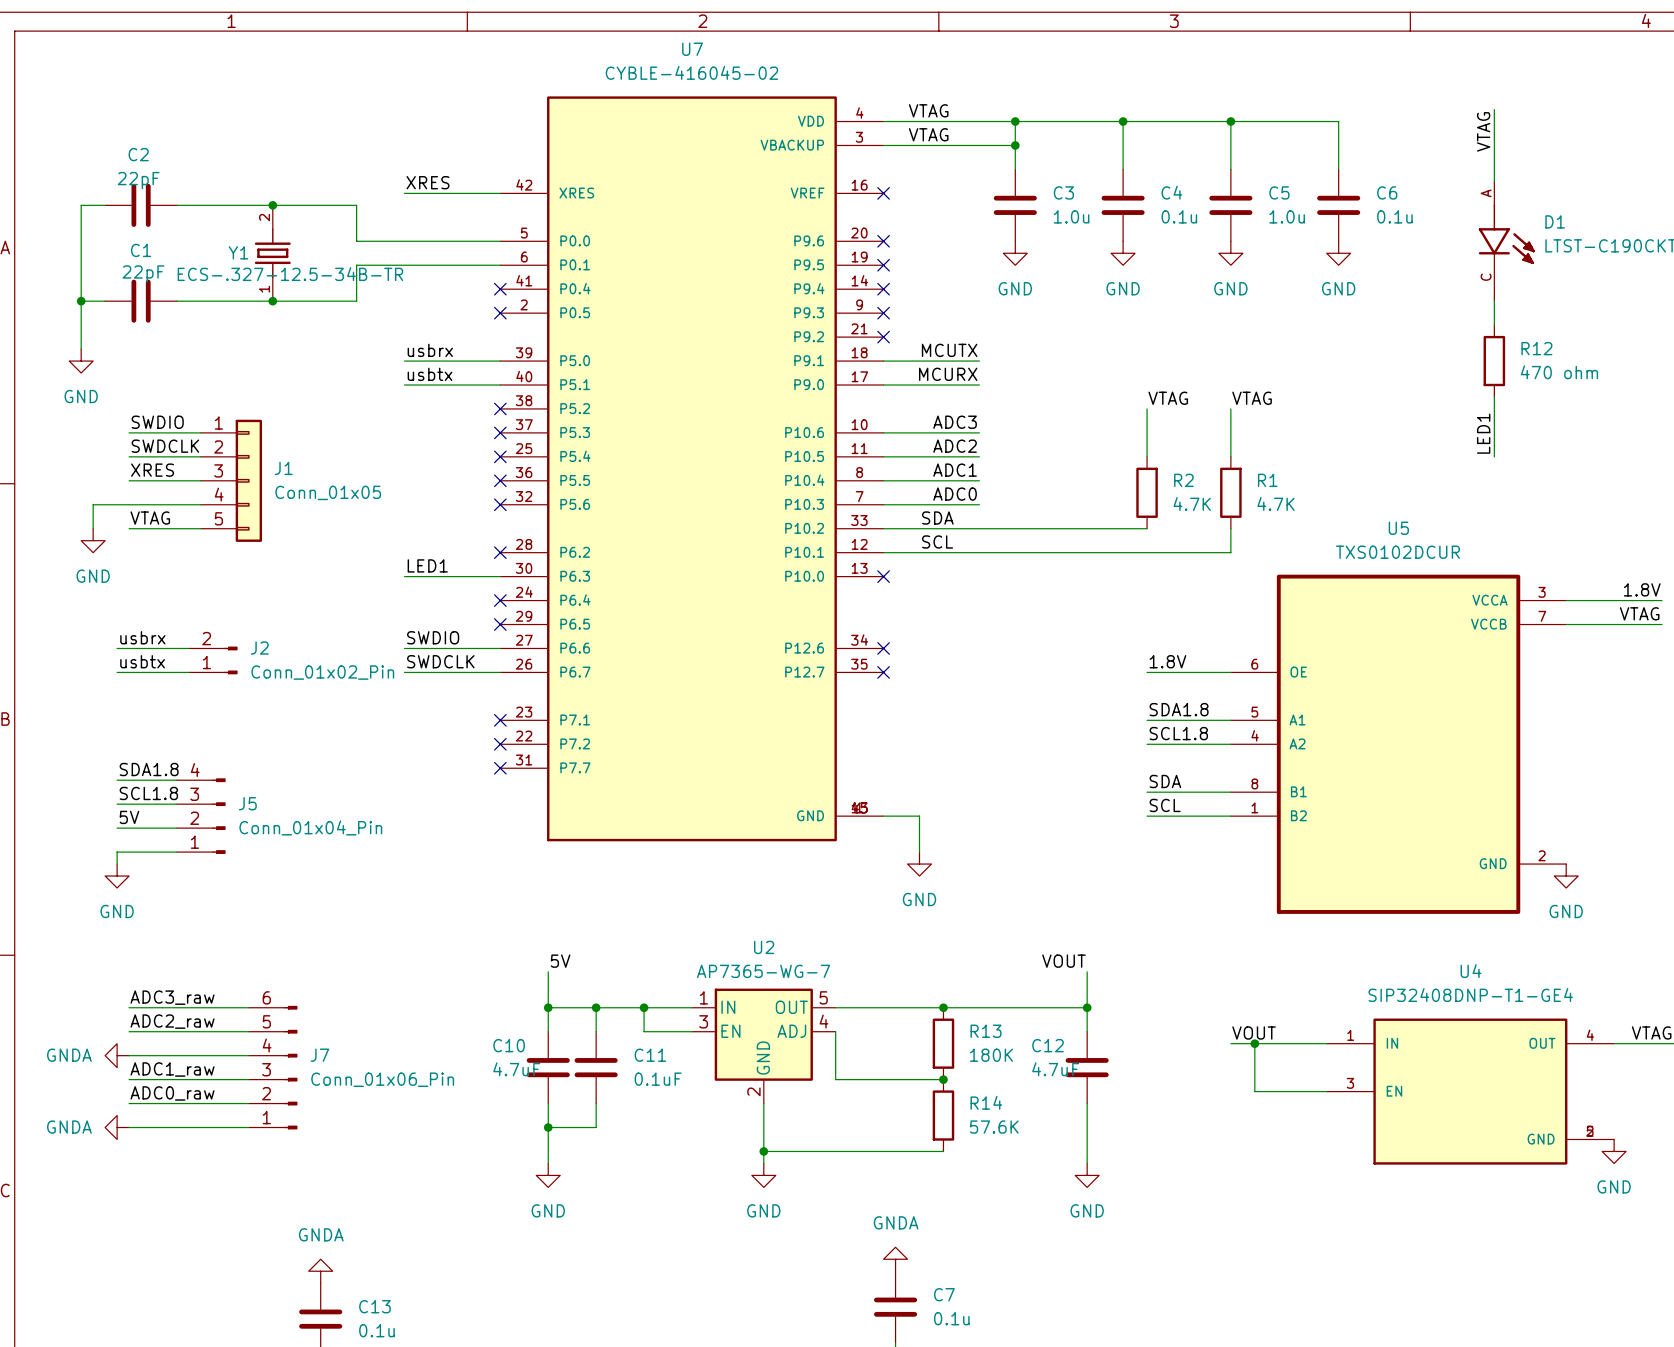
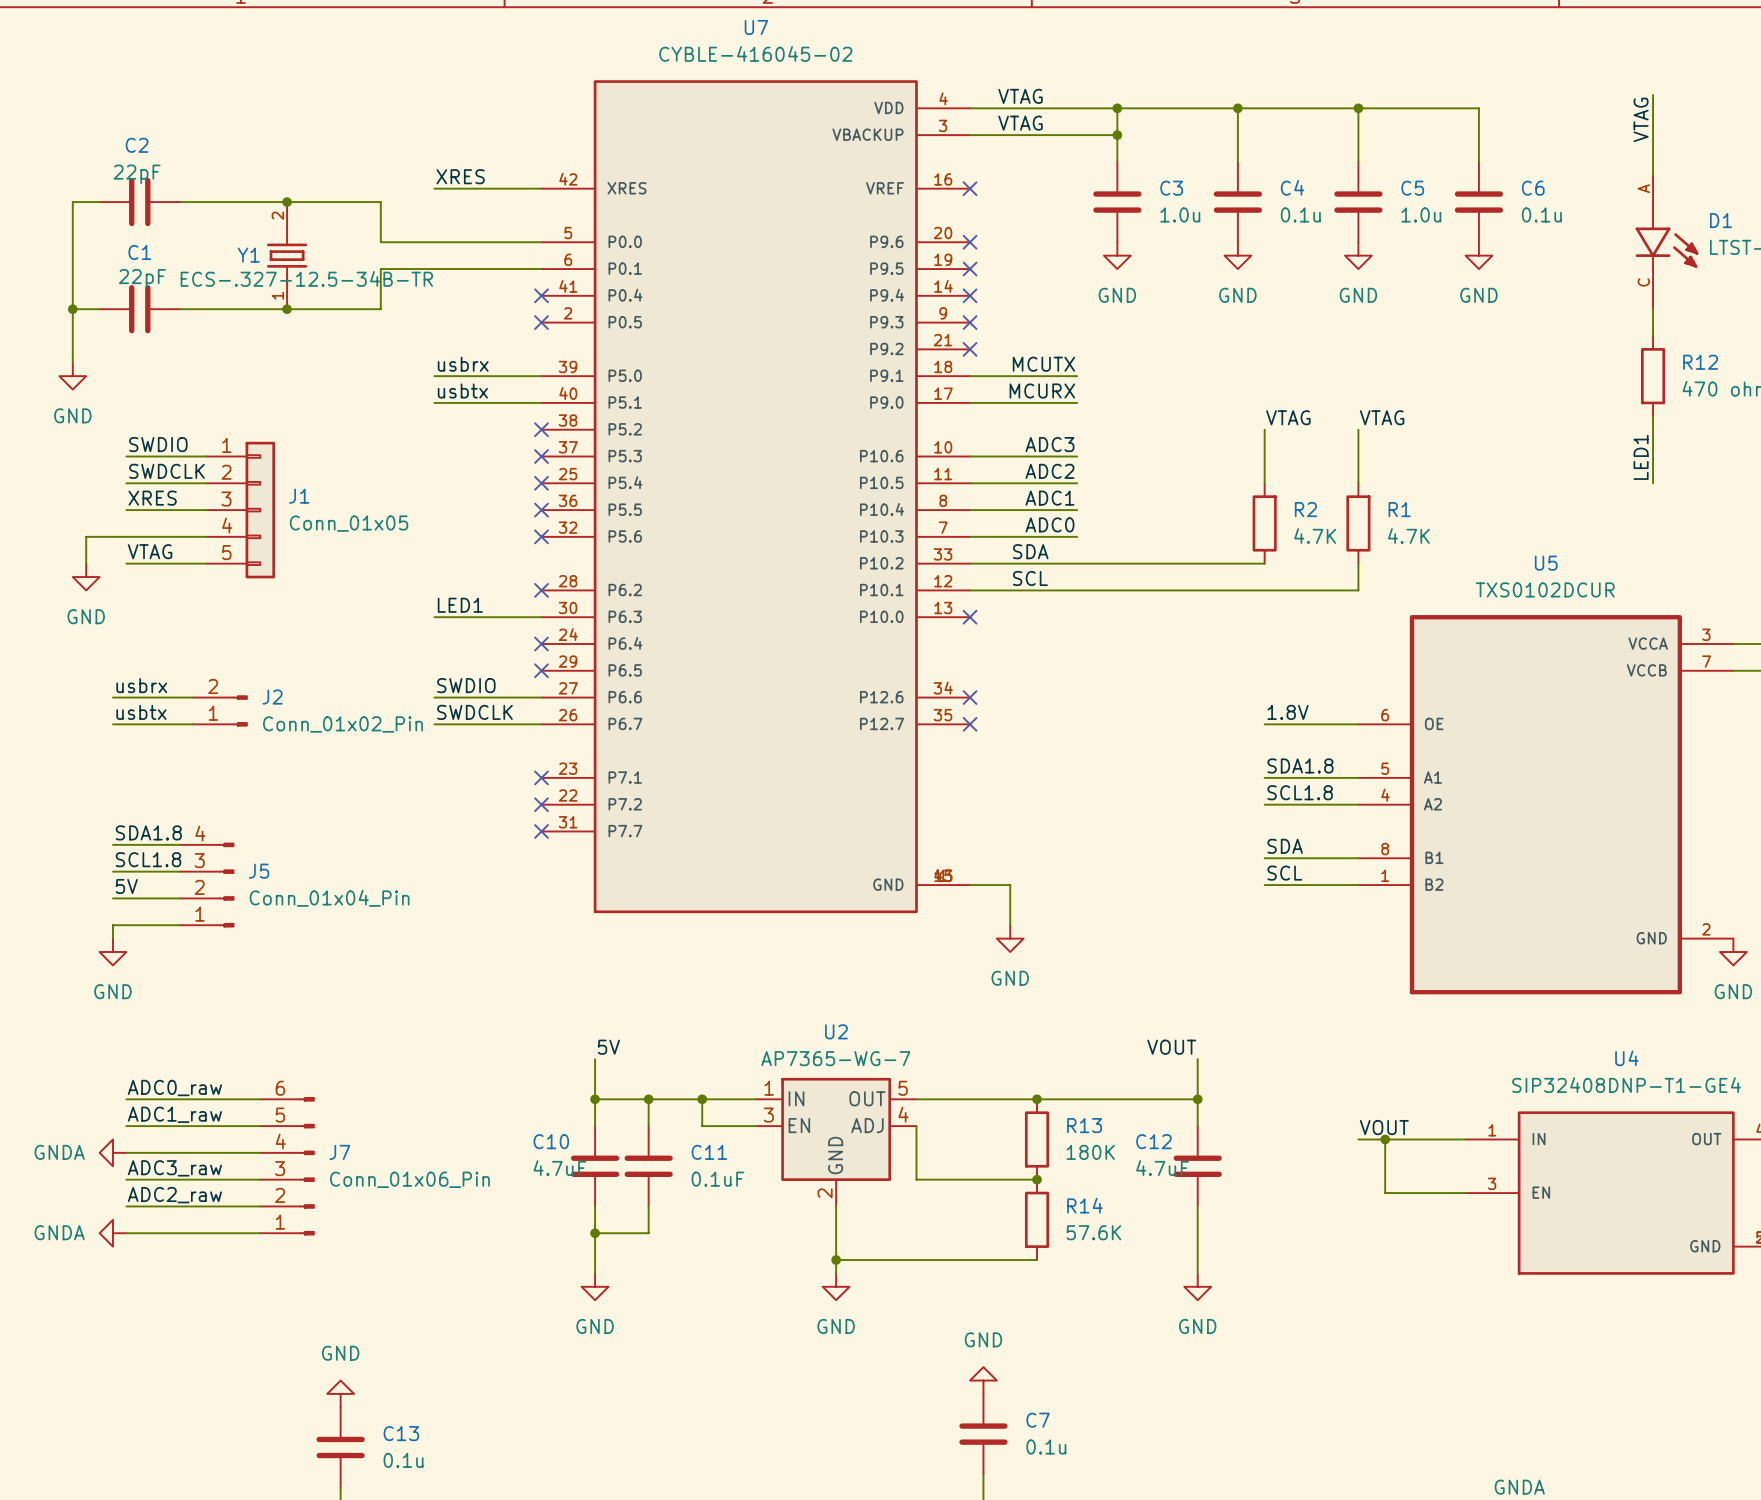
label: ADC3_raw (172, 997) -> ADC0_raw (174, 1088)
label: ADC2_raw (172, 1021) -> ADC1_raw (174, 1114)
label: ADC1_raw (172, 1069) -> ADC3_raw (174, 1168)
label: ADC0_raw (172, 1093) -> ADC2_raw (174, 1195)
power symbol: GNDA (895, 1259) -> GND (983, 1380)
power symbol: GNDA (320, 1271) -> GND (340, 1393)

